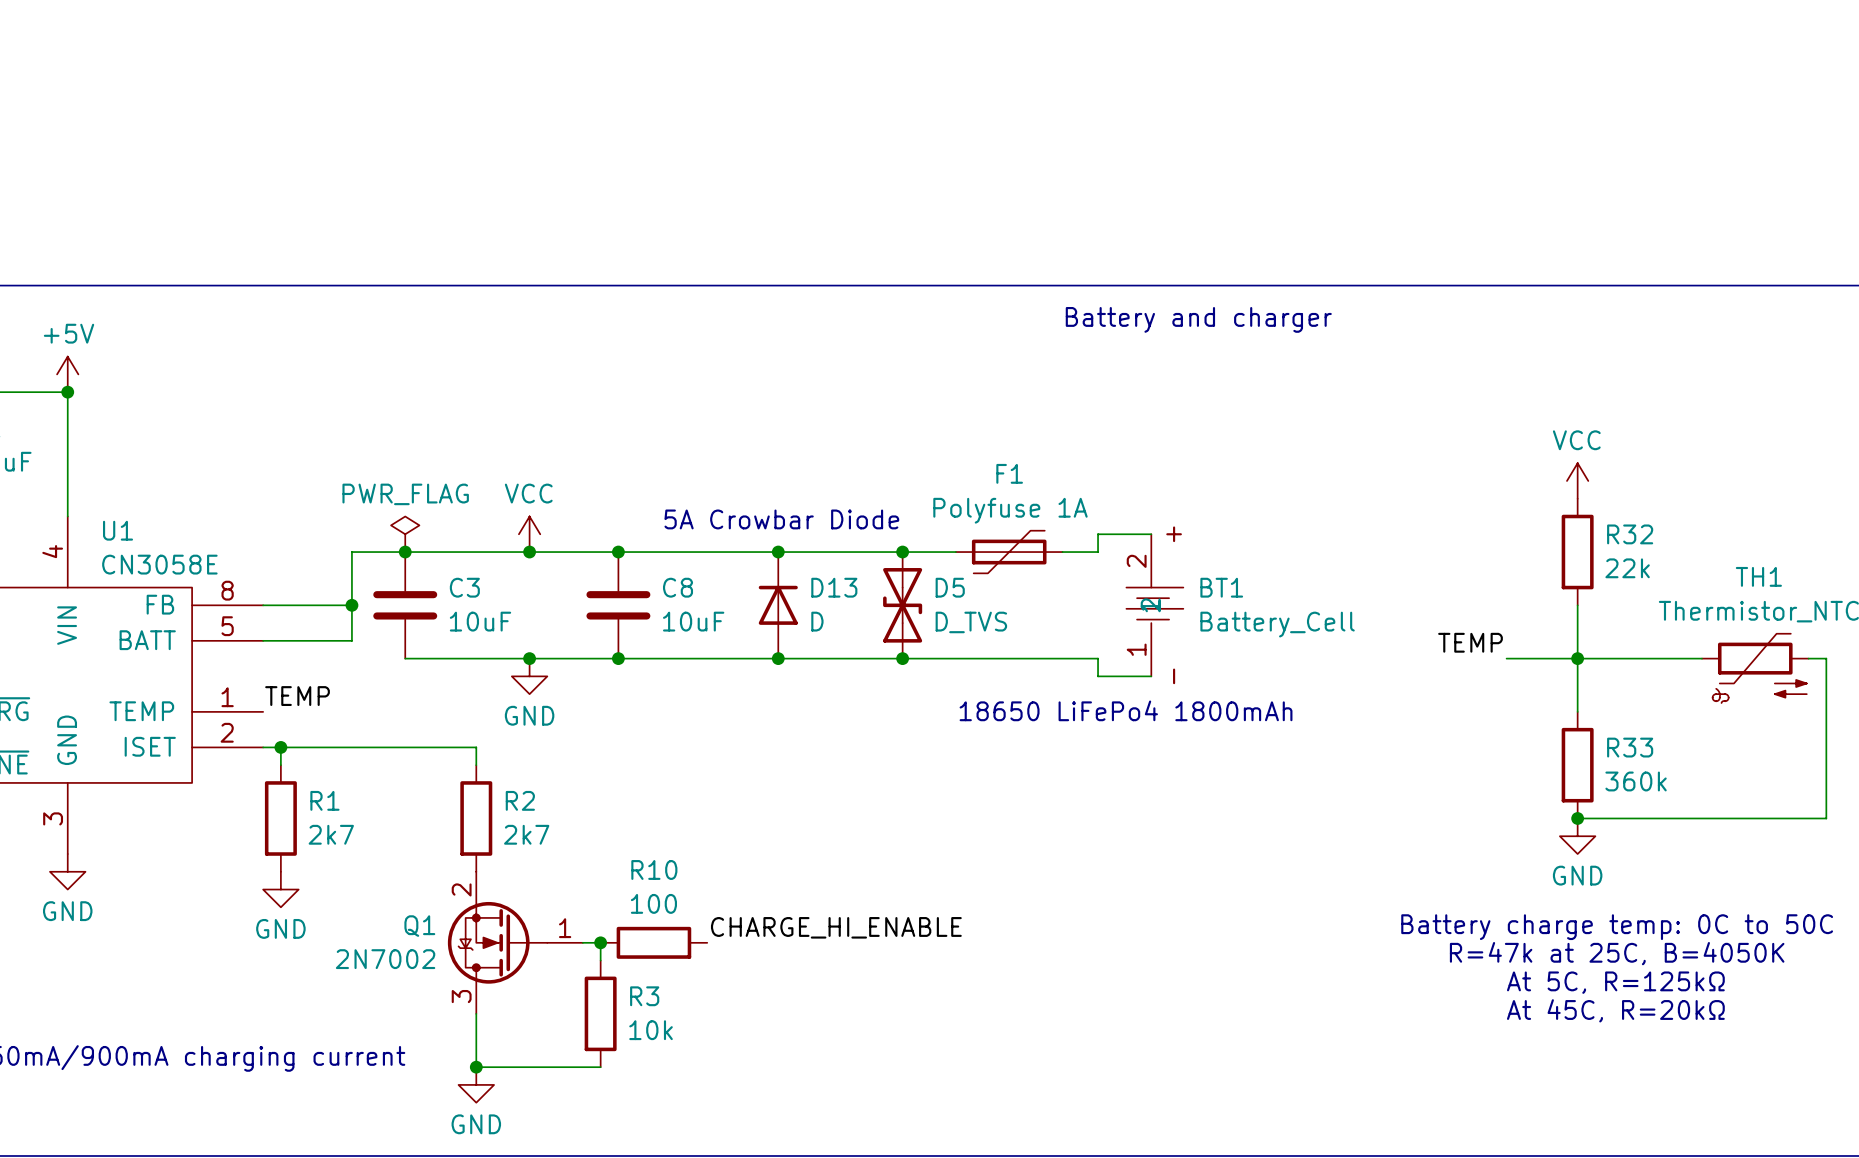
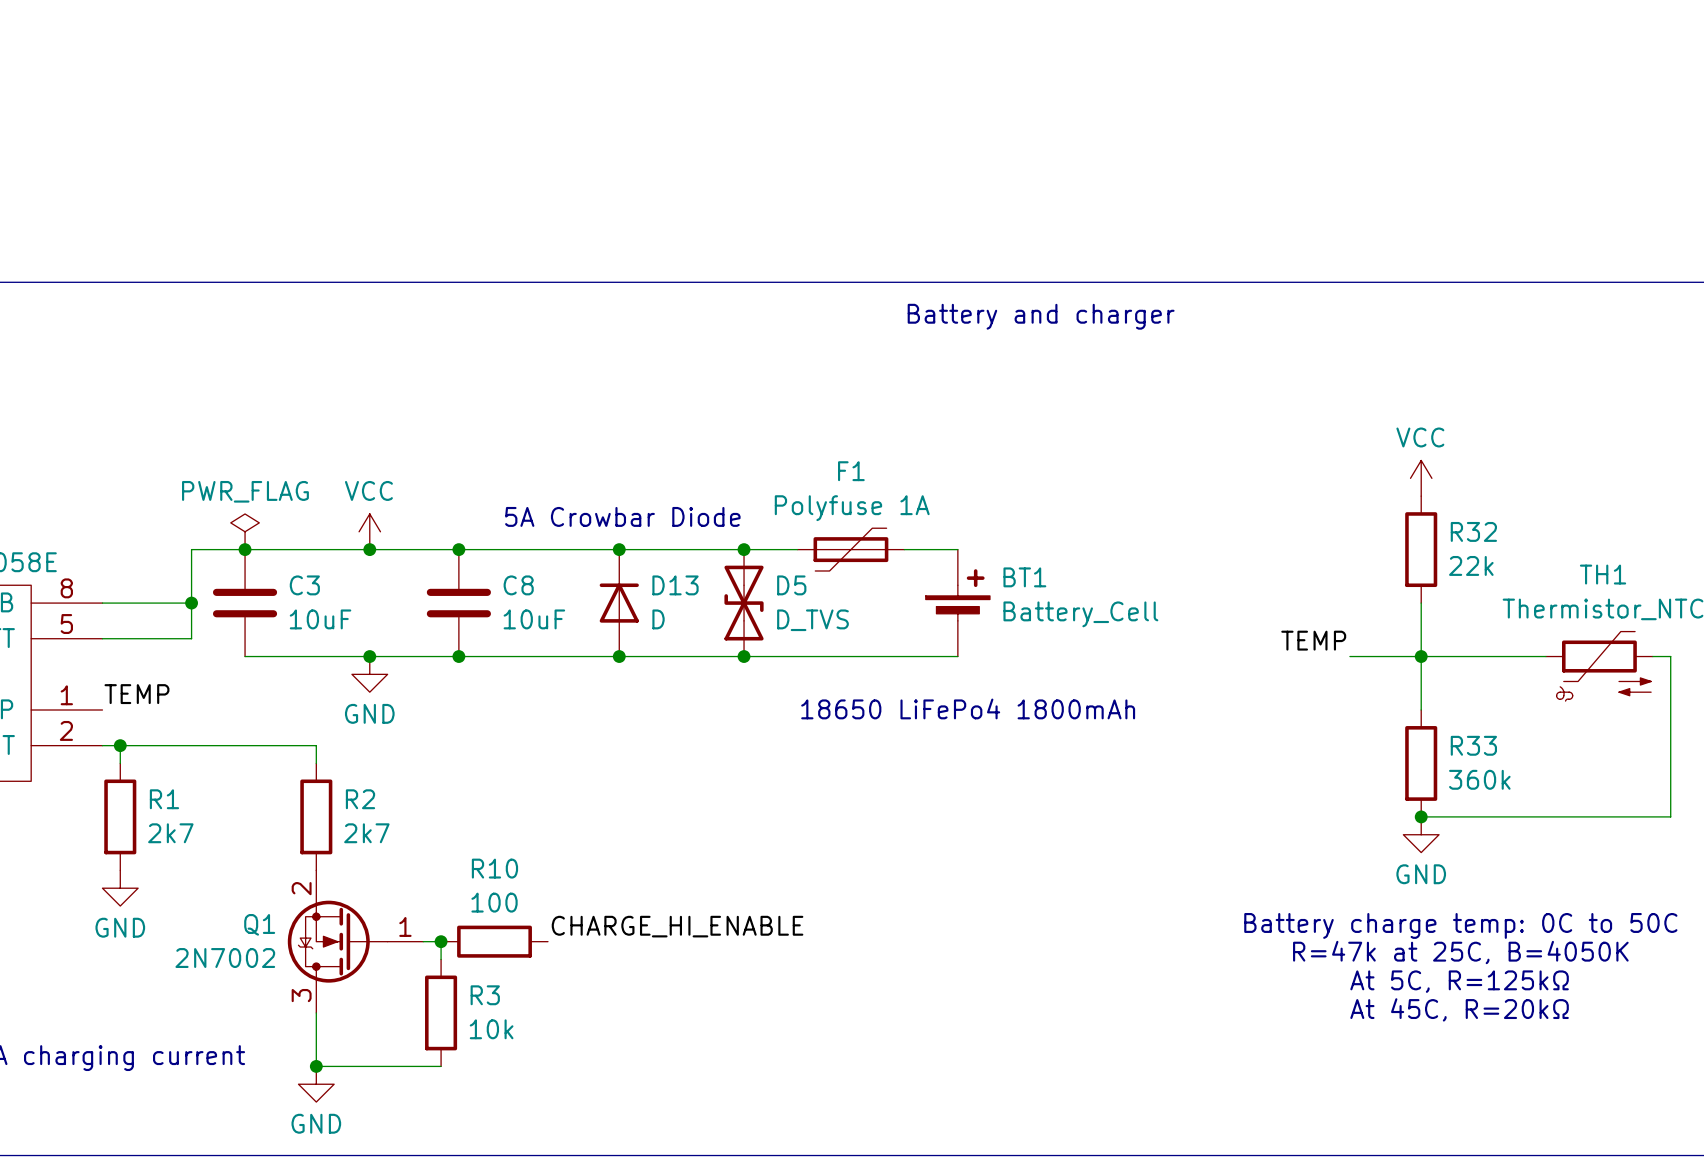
BT1 symbol: [1126, 534, 1184, 677] -> [925, 549, 990, 657]
wire: (1151, 534) (1098, 534) (1098, 552) -> (957, 549) (940, 549)
wire: (1098, 658) (1098, 676) (1151, 676) -> (940, 656) (957, 656)

